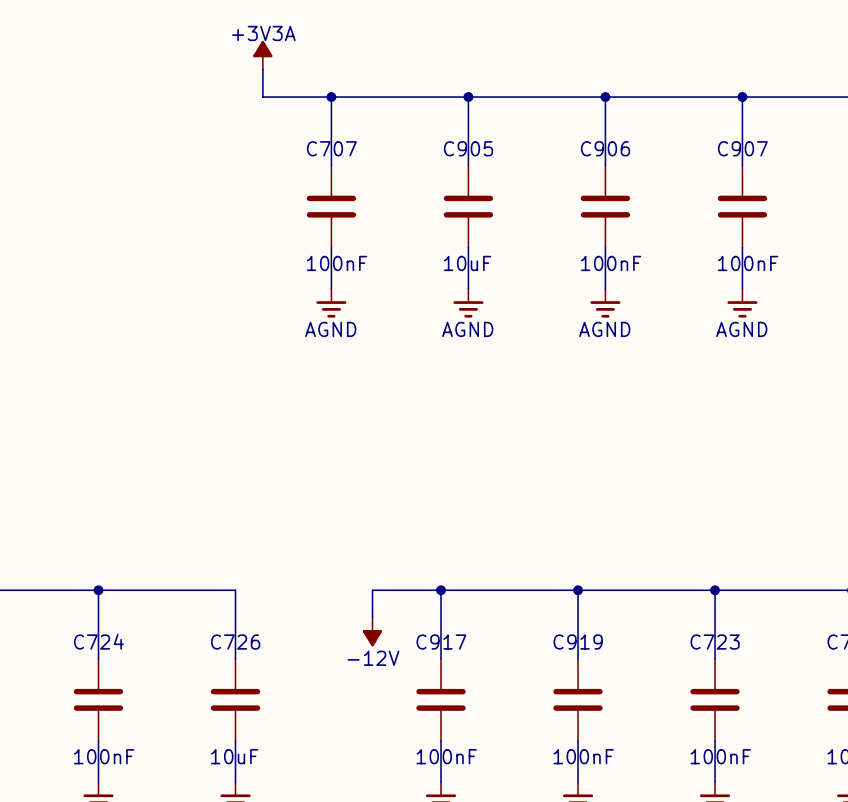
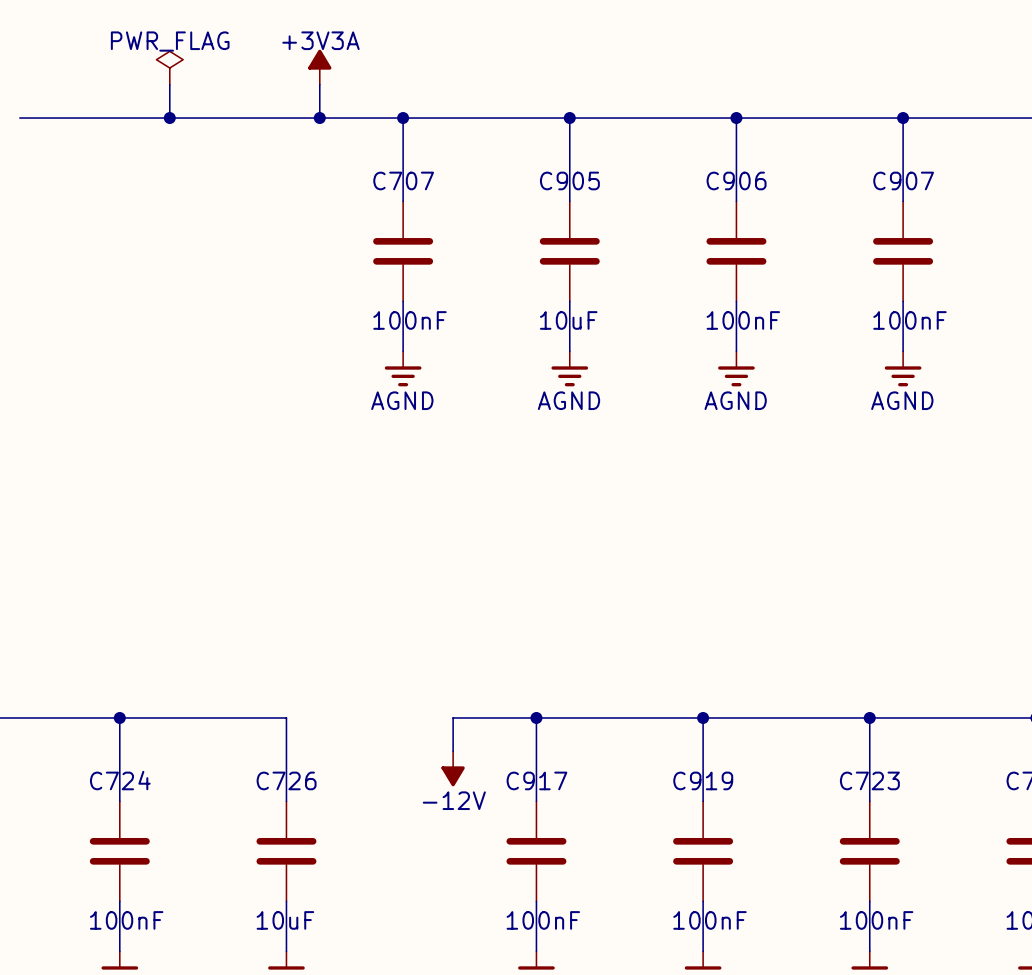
power symbol: none -> PWR_FLAG (169, 68)
wire: none -> (169, 84) (169, 118)
wire: none -> (19, 118) (319, 118)
junction: none -> (169, 118)
junction: none -> (319, 118)

